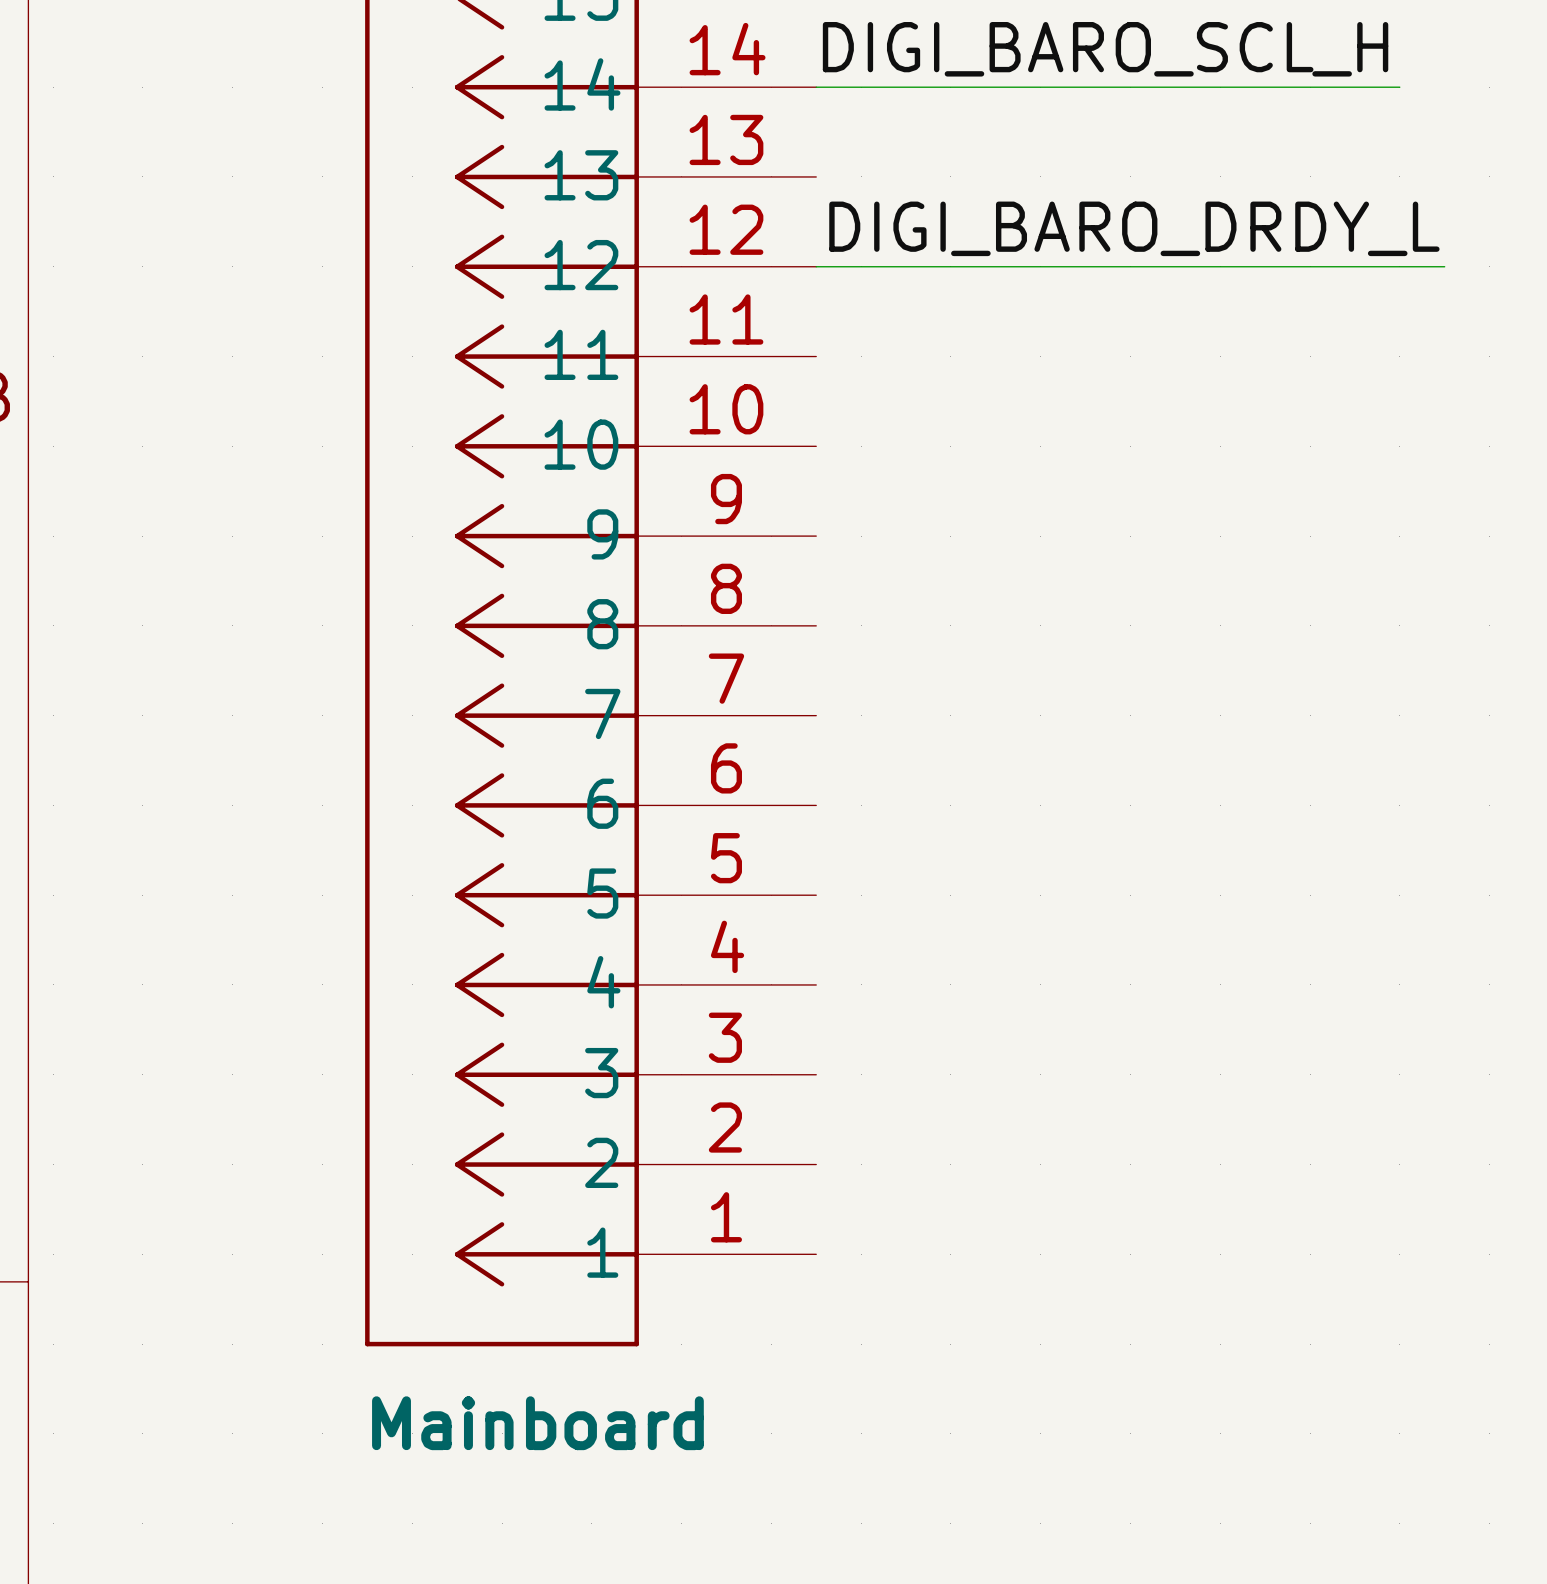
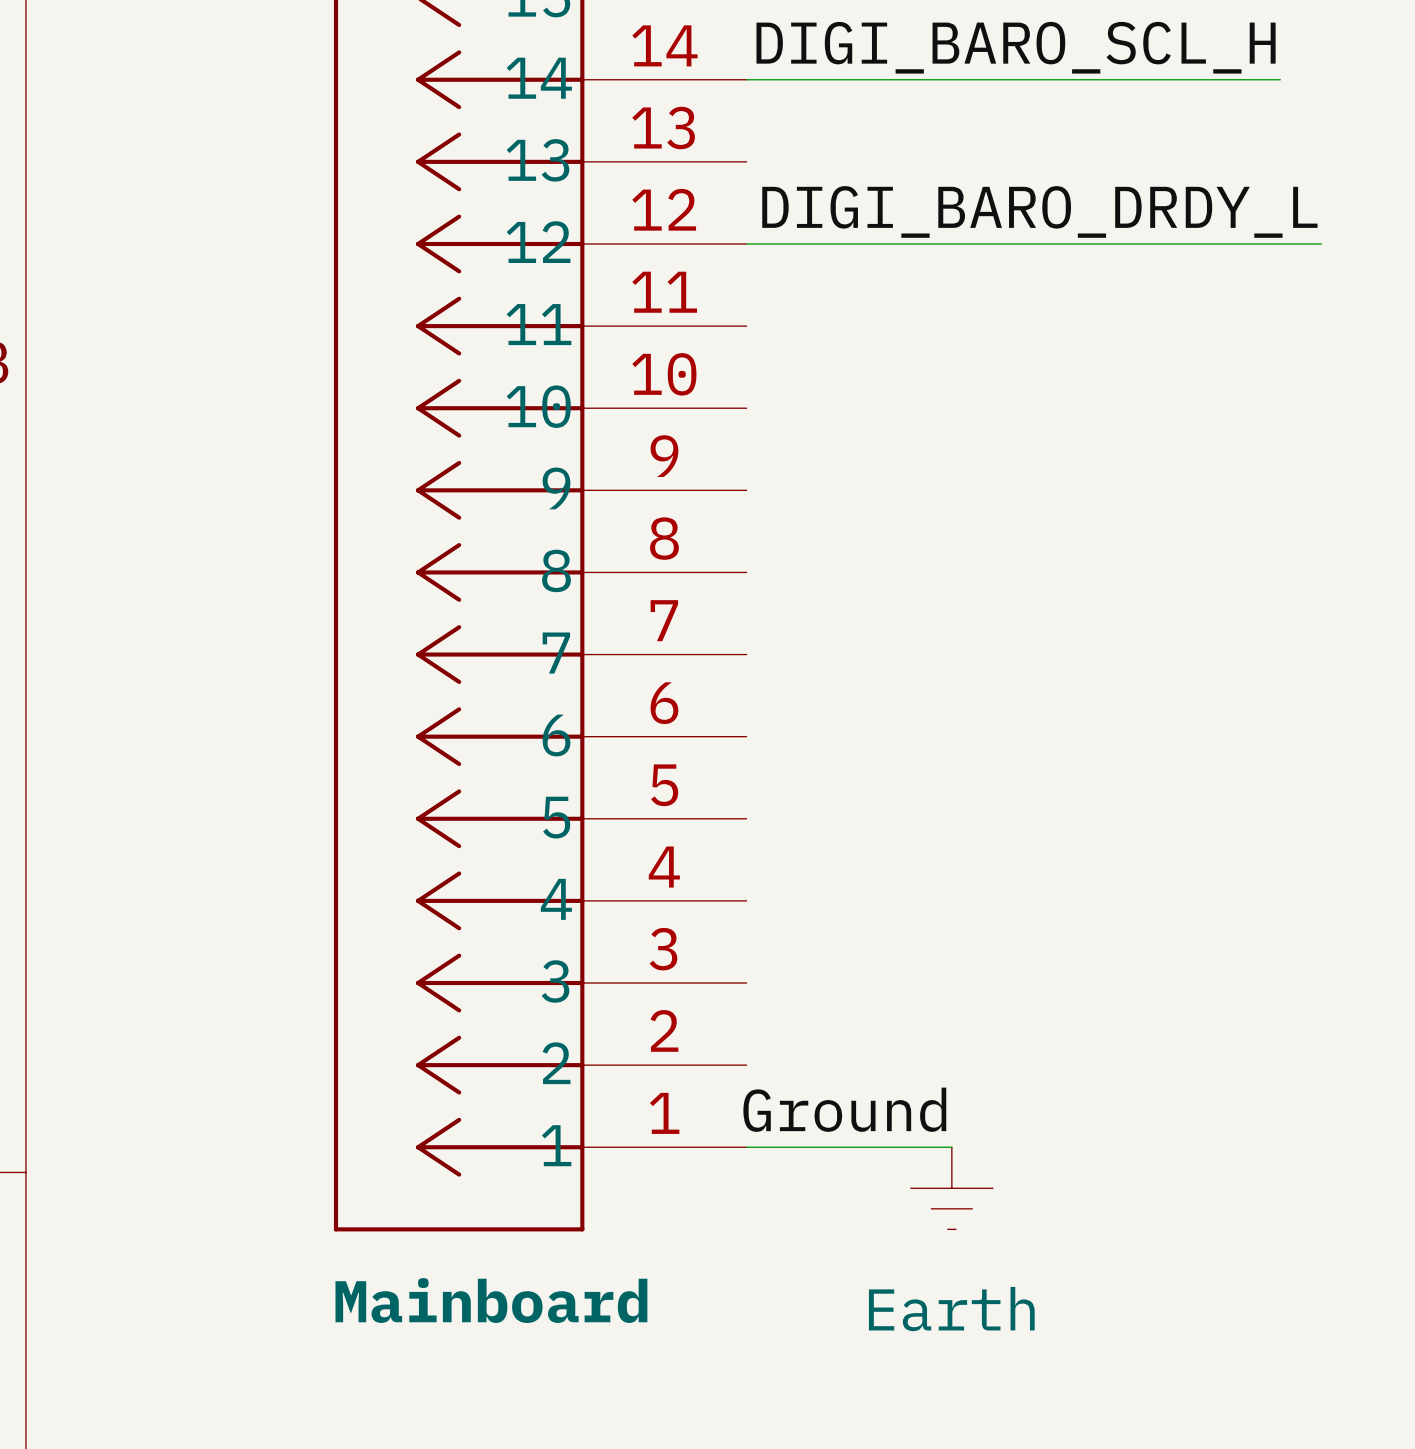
label: none -> Ground (844, 1109)
wire: none -> (746, 1147) (951, 1147)
power symbol: none -> Earth (951, 1188)

